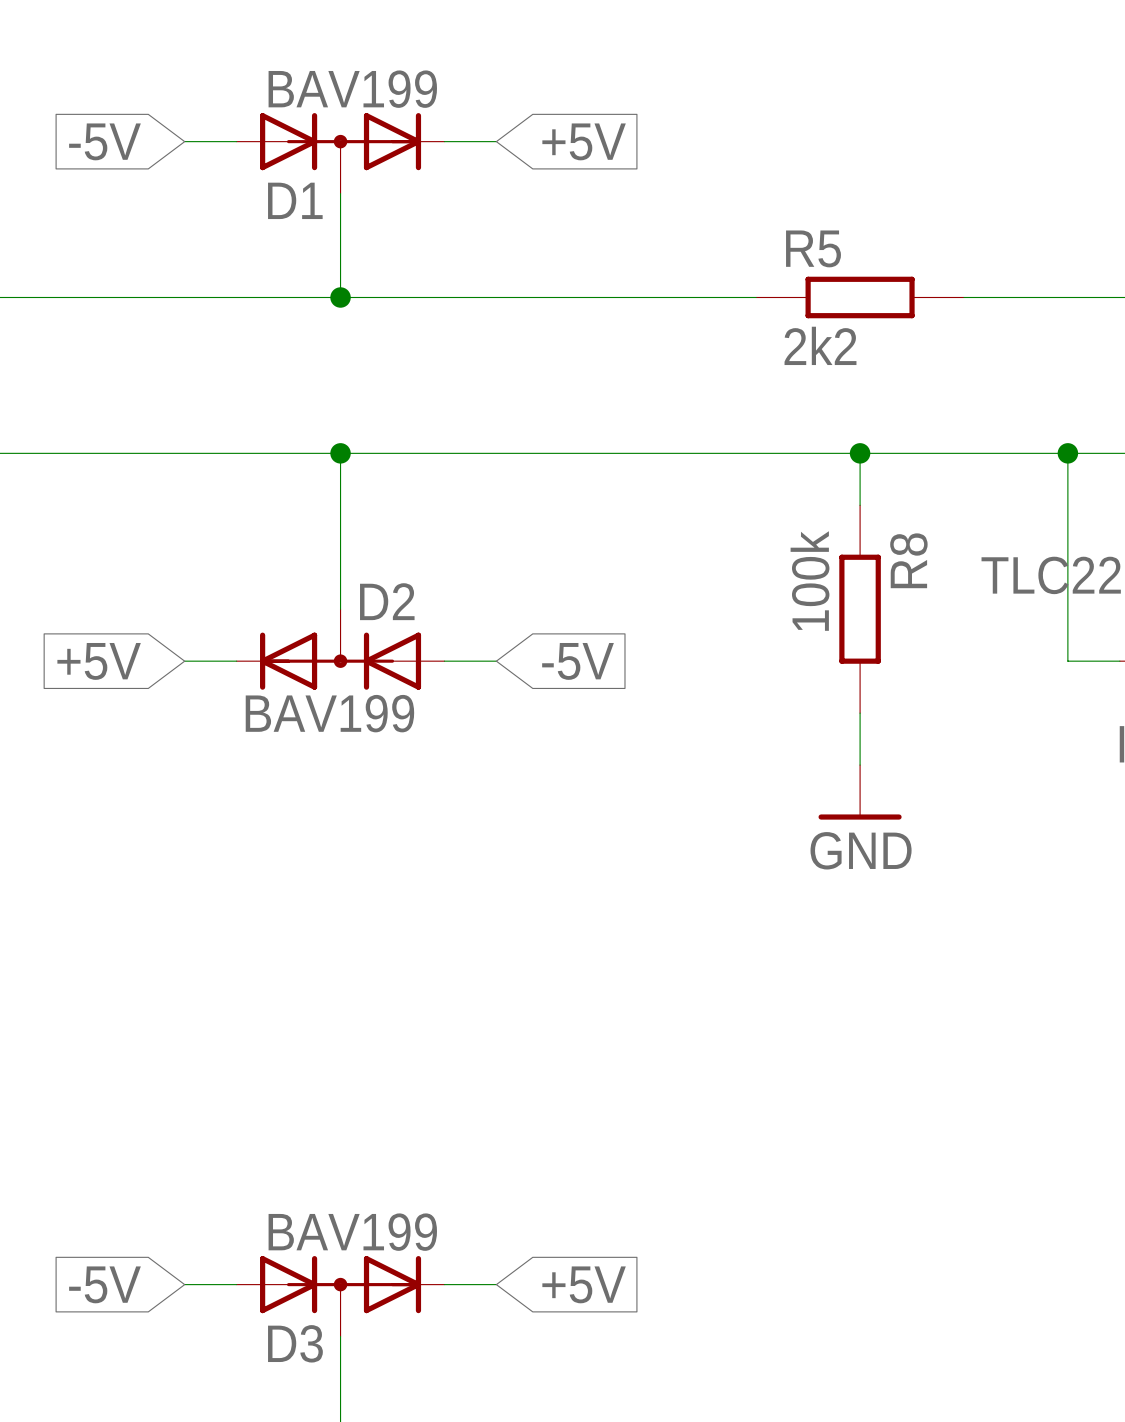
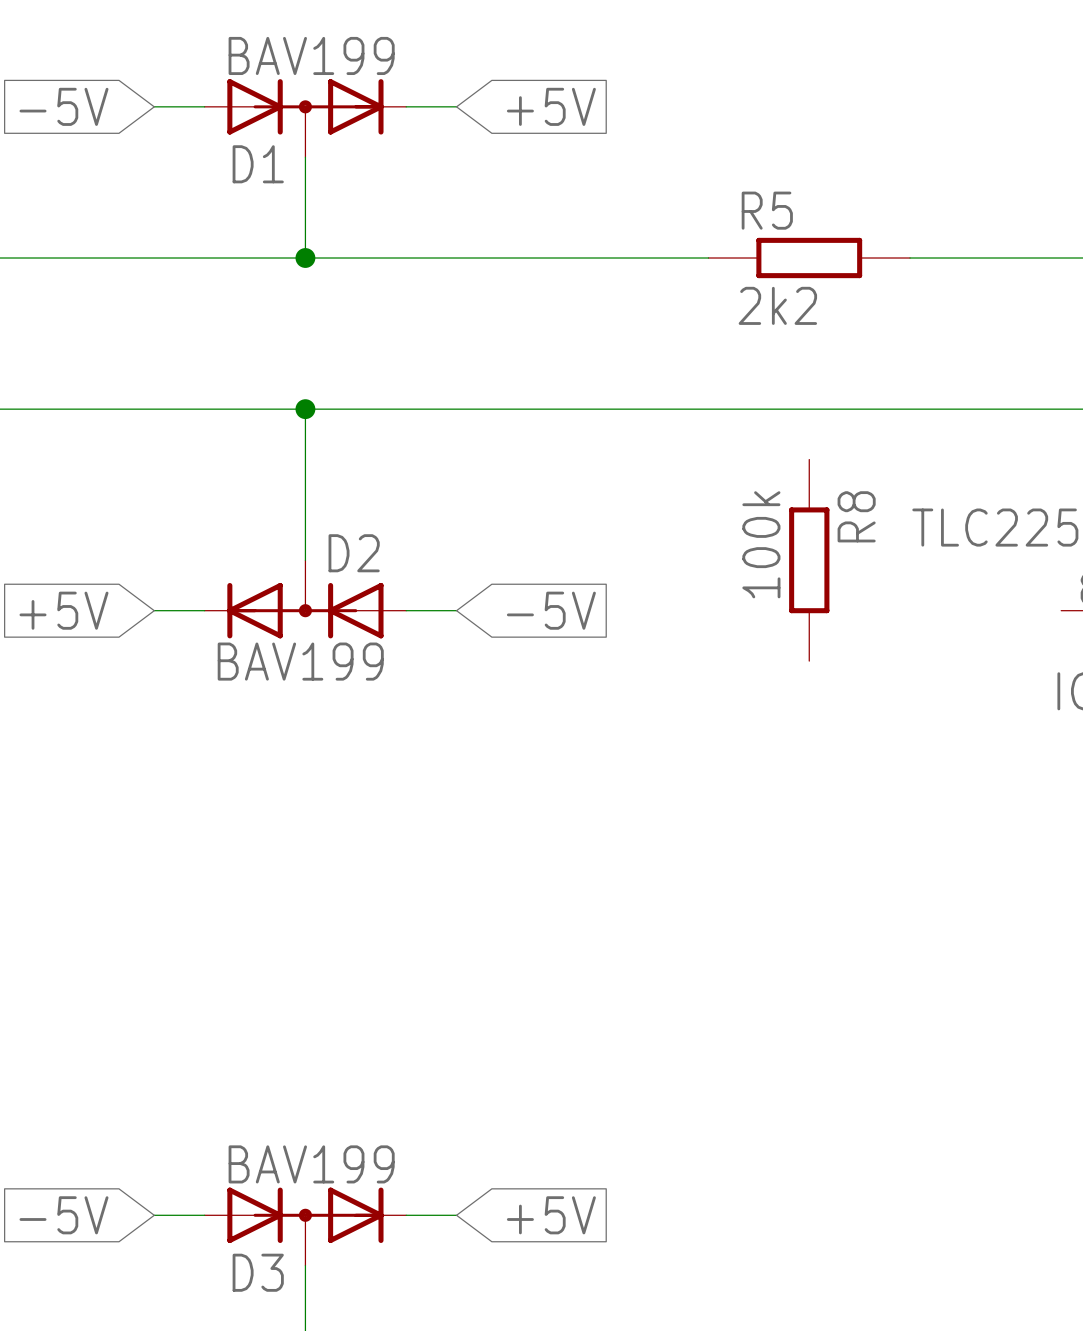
wire: (860, 453) (860, 505) -> none
junction: (860, 453) -> none
wire: (1067, 453) (1067, 661) (1119, 661) -> none
junction: (1067, 453) -> none
wire: (860, 713) (860, 765) -> none
power symbol: GND (860, 792) -> none

